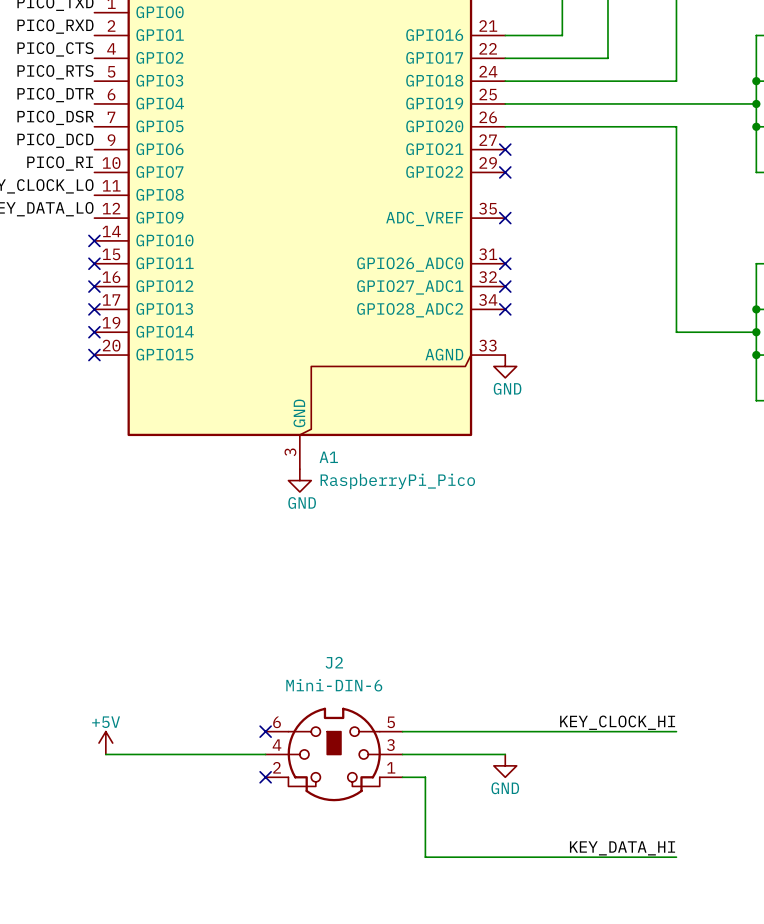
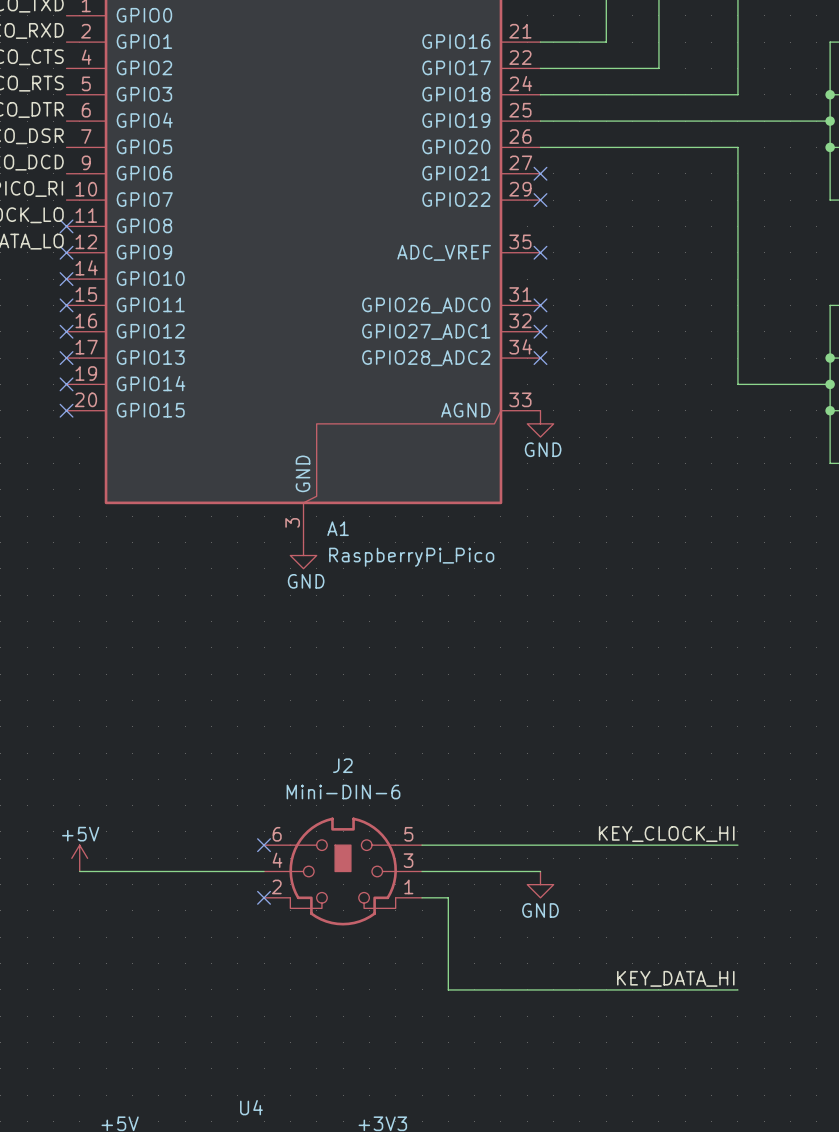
no-connect mark: none -> (66, 226)
no-connect mark: none -> (66, 252)

